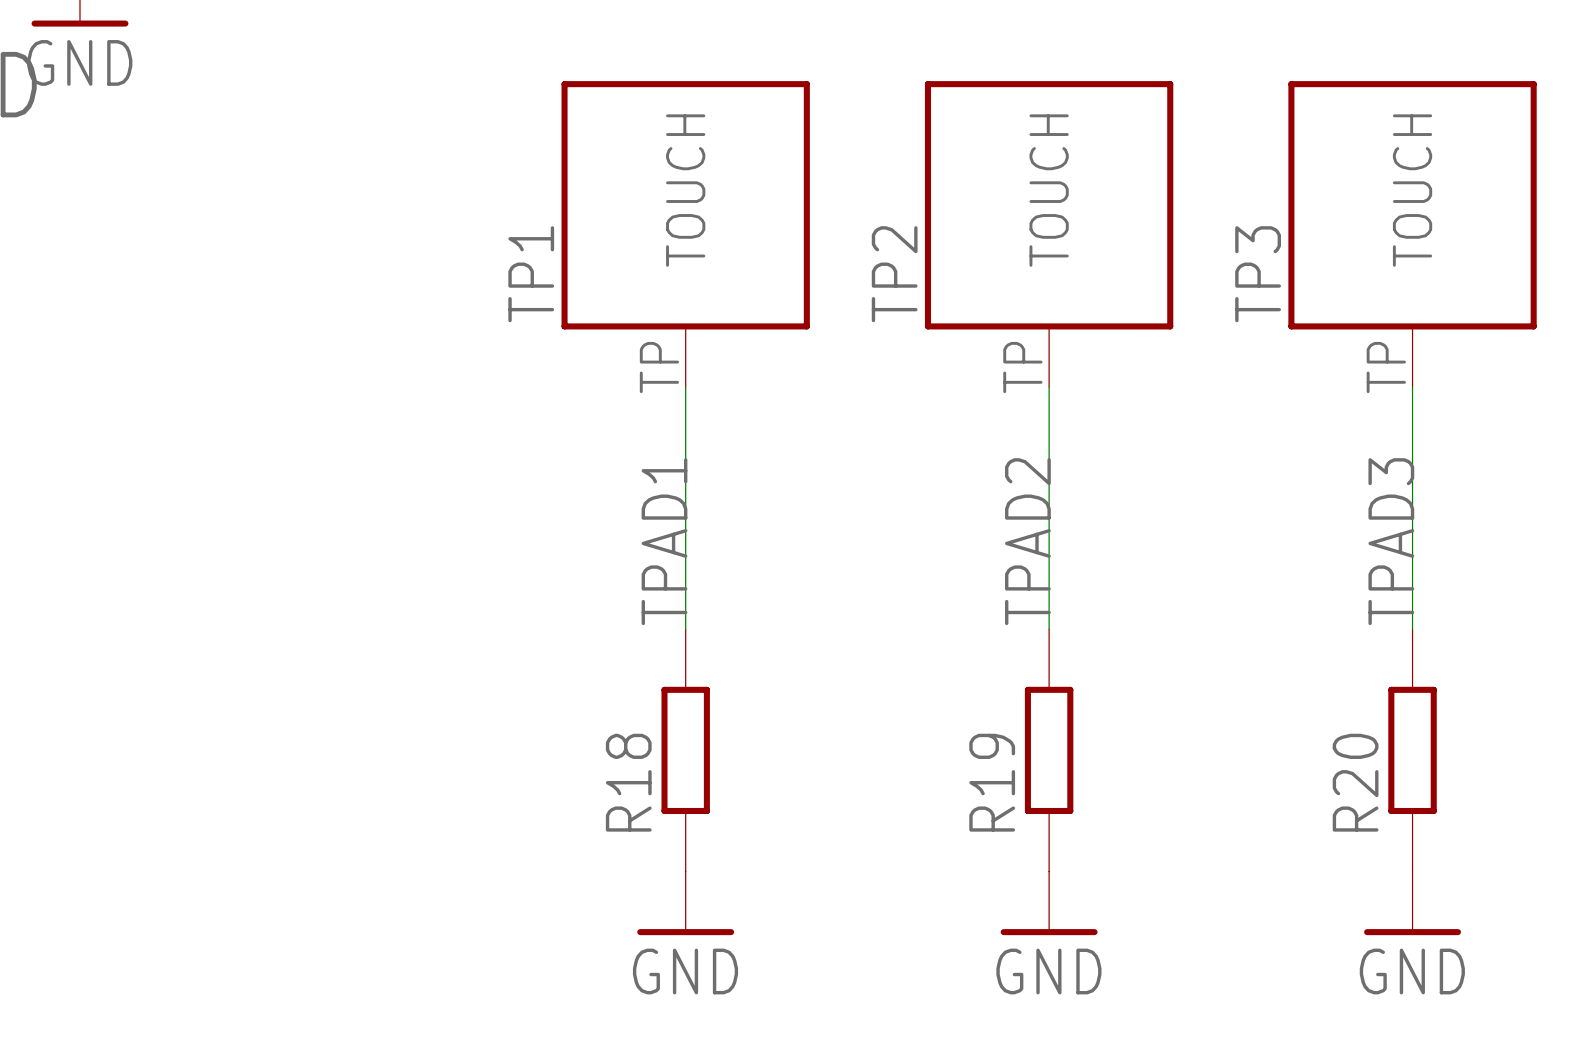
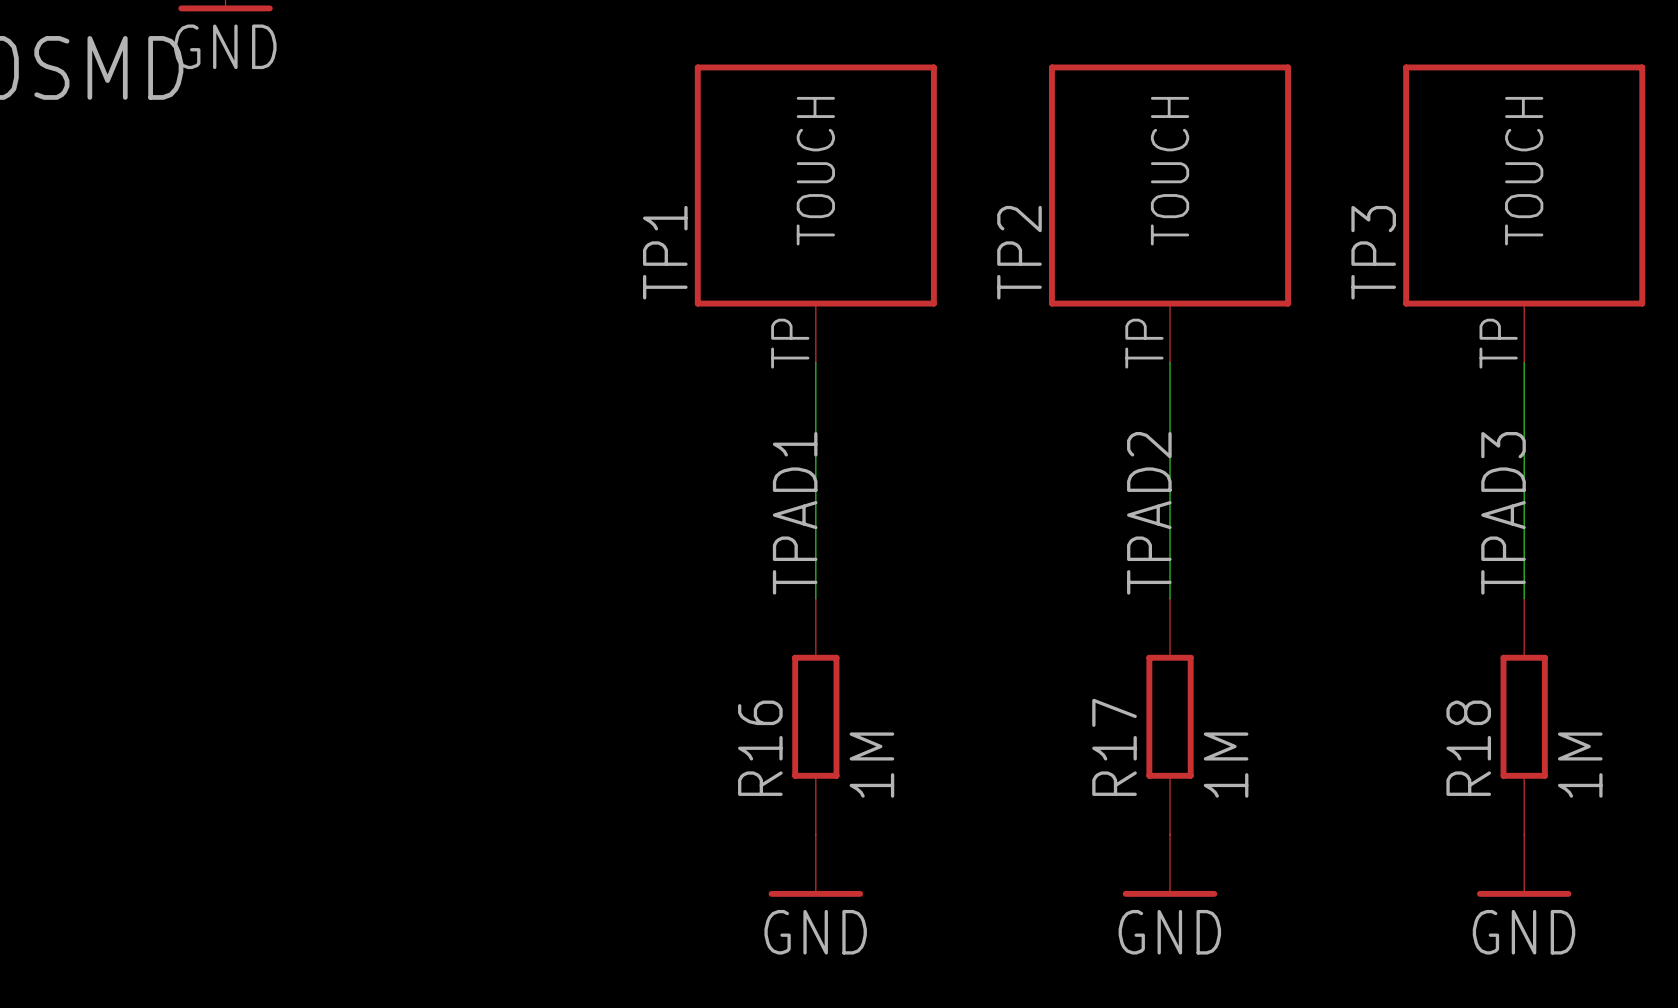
R18 name: R18 (628, 782) -> R16 (760, 748)
R19 name: R19 (992, 782) -> R17 (1114, 747)
R20 name: R20 (1355, 782) -> R18 (1468, 748)
R18 value: none -> 1M (871, 765)
R19 value: none -> 1M (1226, 765)
R20 value: none -> 1M (1580, 765)

